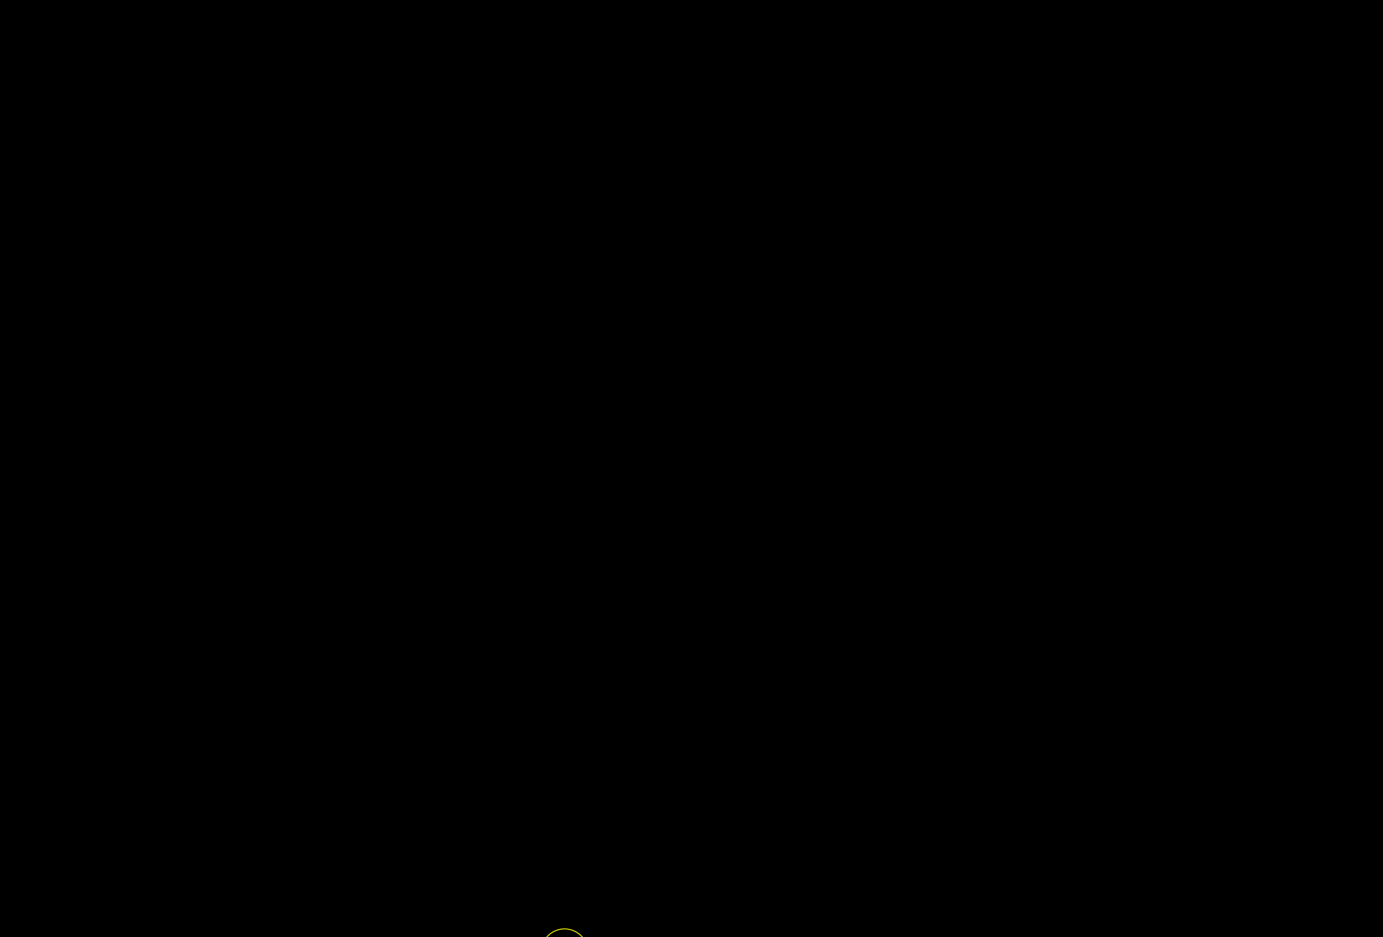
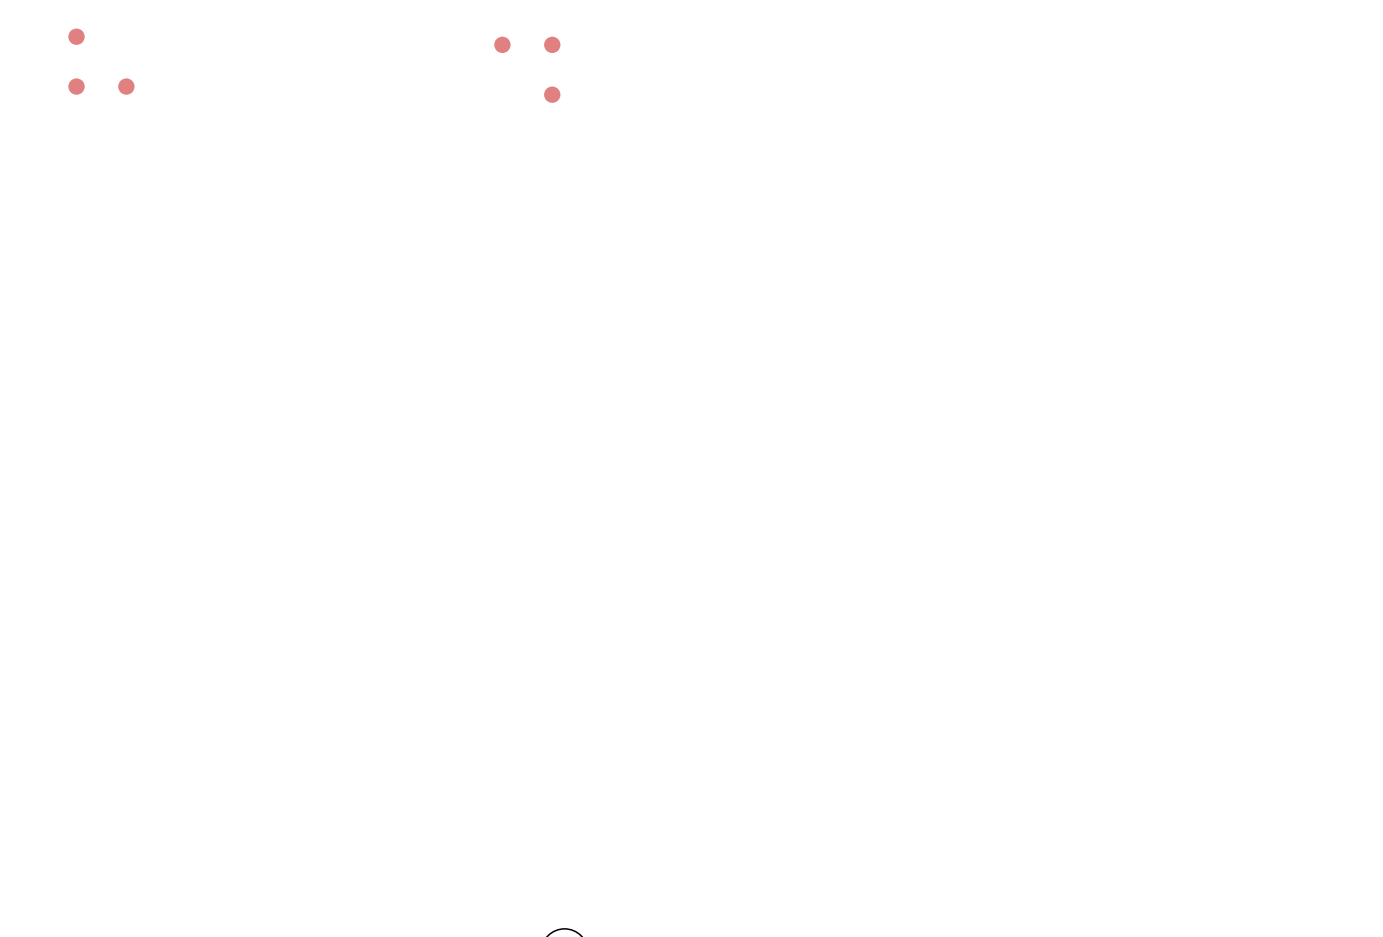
part: none -> (76, 36)
part: none -> (502, 44)
part: none -> (552, 44)
part: none -> (76, 86)
part: none -> (126, 86)
part: none -> (552, 94)

